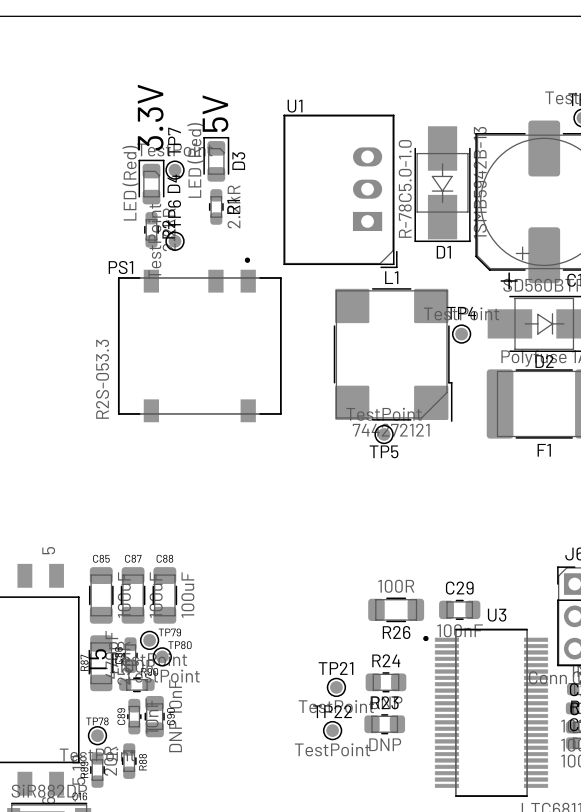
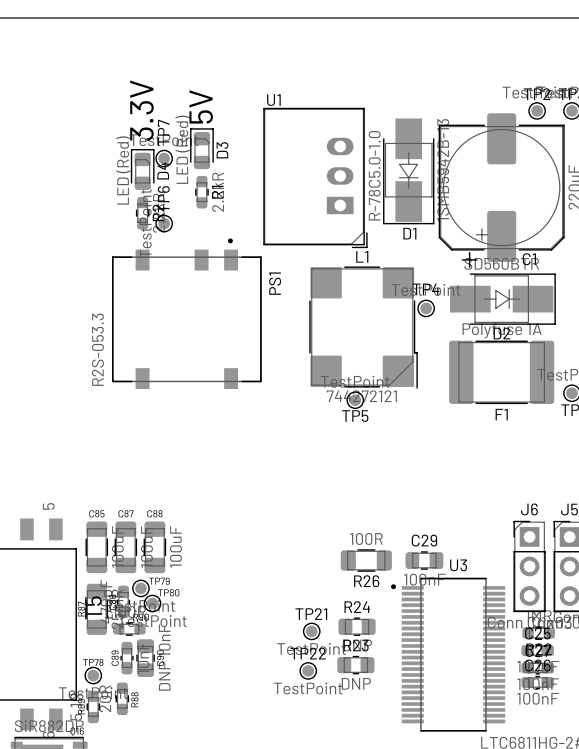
PS1 name rotation: 0° (120, 267) -> 90° counterclockwise (275, 283)
PS1 name position: PS1 (120, 267) -> PS1 (275, 283)

